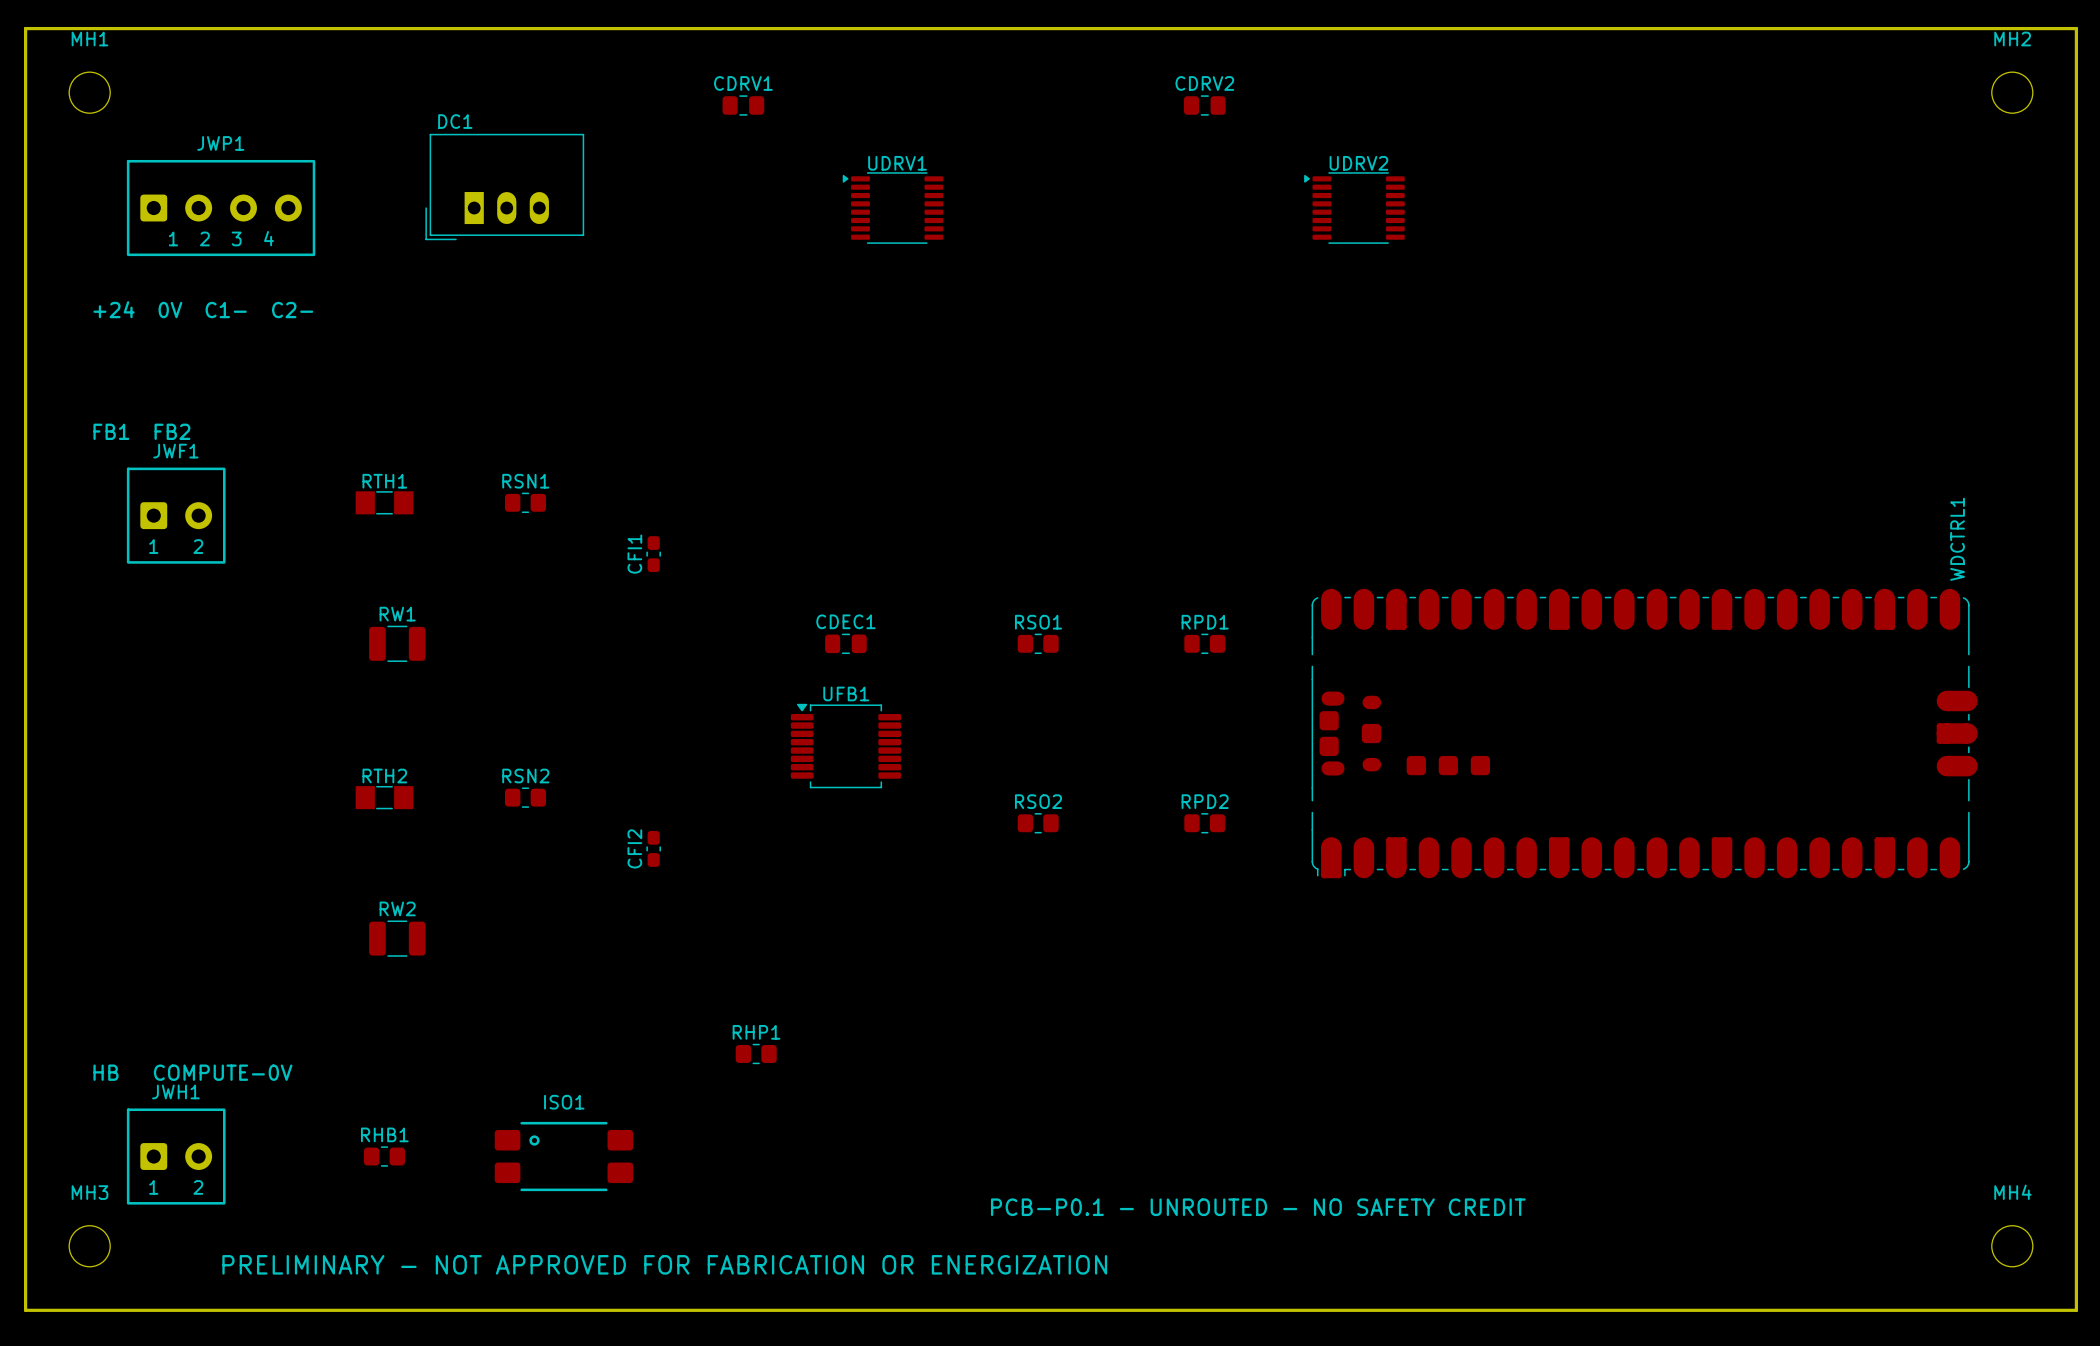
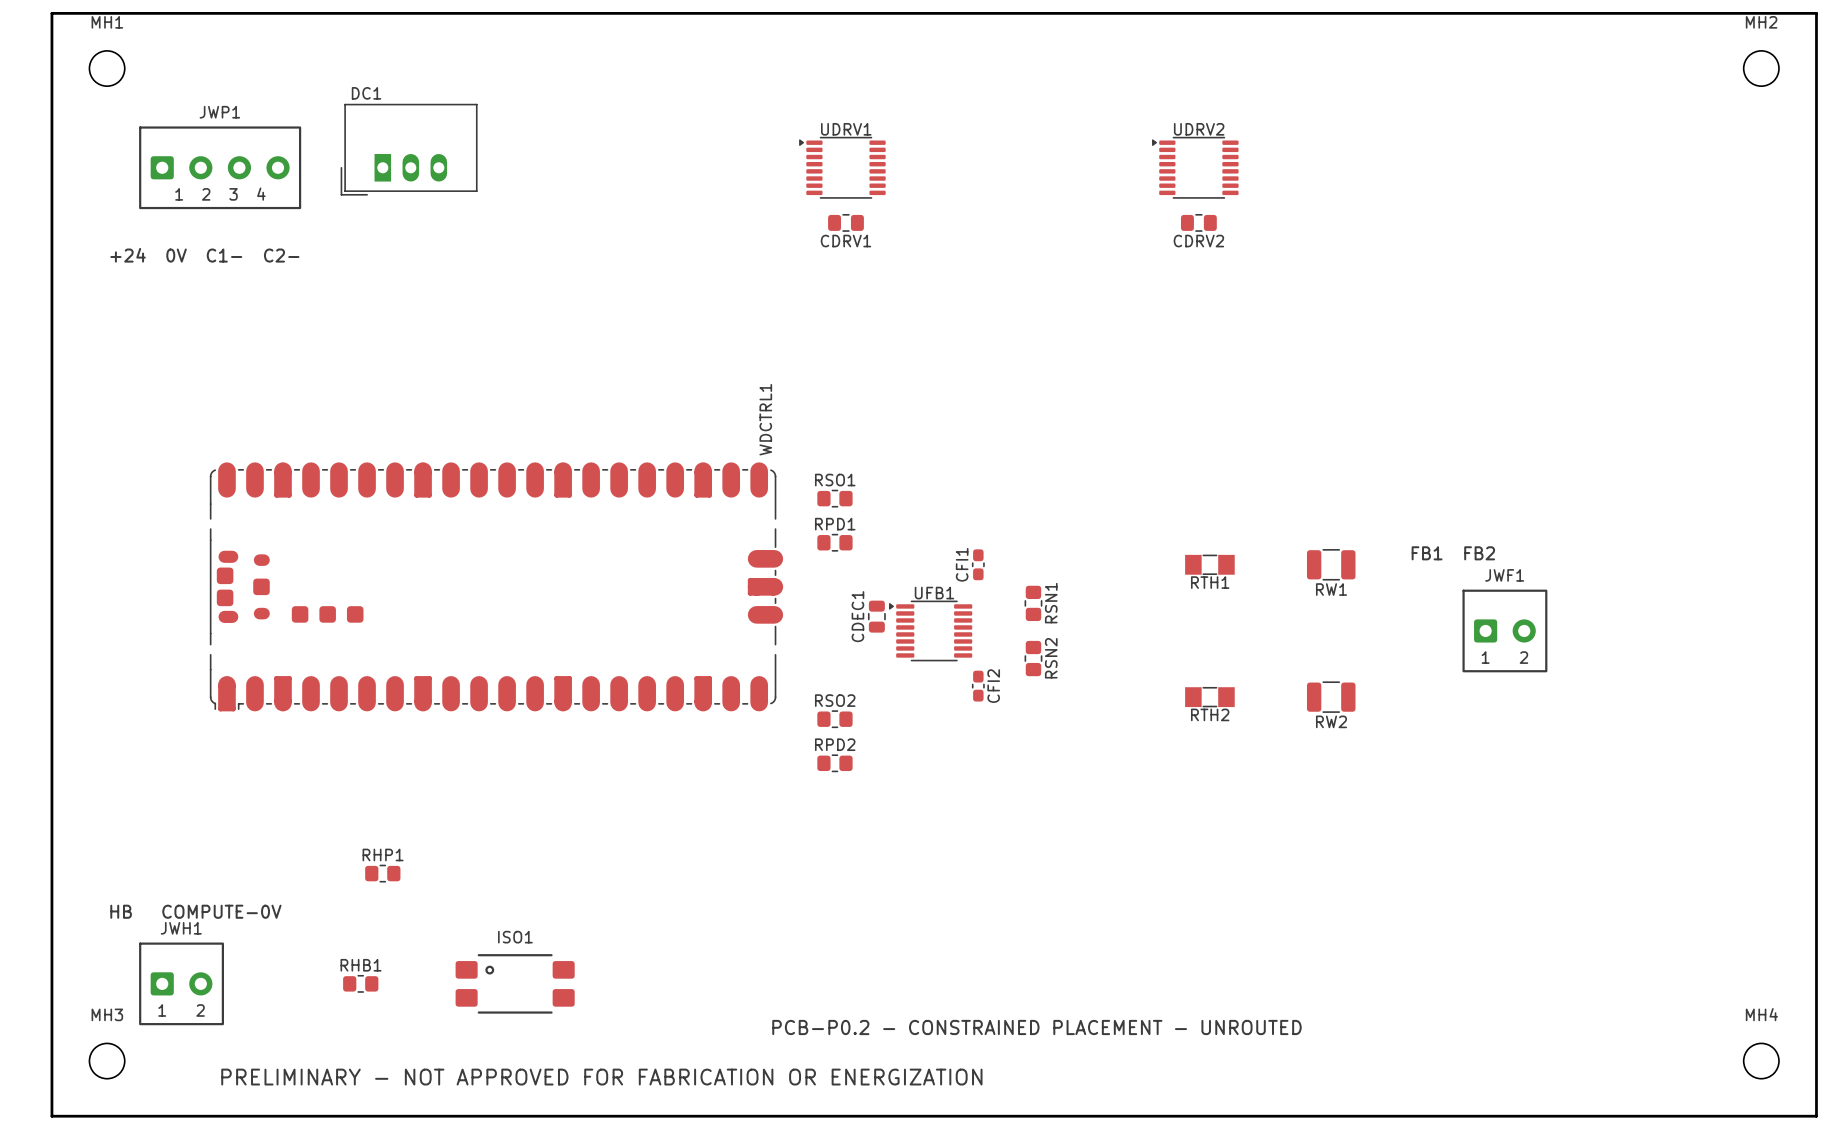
CDRV1 name position: CDRV1 (743, 83) -> CDRV1 (845, 241)
CDRV2 name position: CDRV2 (1204, 83) -> CDRV2 (1198, 241)
CDRV1 position: (743, 105) -> (845, 222)
CDRV2 position: (1204, 105) -> (1198, 222)
DC1 position: (504, 187) -> (409, 149)
UDRV1 position: (893, 208) -> (842, 167)
text: FB1 FB2 (141, 431) -> none
RTH1 name position: RTH1 (384, 481) -> RTH1 (1210, 582)
RTH1 position: (384, 502) -> (1209, 564)
RSN1 rotation: 0° (525, 502) -> 90° clockwise (1033, 603)
RSN1 position: (525, 502) -> (1033, 603)
JWF1 position: (176, 515) -> (1504, 630)
CFI1 position: (653, 554) -> (978, 564)
RW1 name position: RW1 (397, 614) -> RW1 (1331, 589)
CDEC1 name position: CDEC1 (845, 621) -> CDEC1 (857, 616)
CDEC1 footprint: [825, 633, 867, 655] -> [868, 600, 886, 633]
RW1 position: (397, 643) -> (1331, 564)
RSO1 position: (1038, 643) -> (834, 498)
RPD1 position: (1204, 643) -> (834, 542)
text: none -> FB1 FB2 (1453, 553)
UFB1 footprint: [790, 703, 902, 789] -> [889, 600, 973, 662]
WDCTRL1 position: (1644, 733) -> (496, 586)
RTH2 name position: RTH2 (384, 776) -> RTH2 (1210, 714)
RTH2 position: (384, 797) -> (1209, 697)
RSN2 rotation: 0° (525, 797) -> 90° clockwise (1033, 658)
RSN2 position: (525, 797) -> (1033, 658)
RSO2 position: (1038, 823) -> (834, 719)
RPD2 position: (1204, 823) -> (834, 763)
CFI2 name position: CFI2 (634, 848) -> CFI2 (993, 686)
CFI2 position: (653, 848) -> (978, 686)
RW2 name position: RW2 (397, 908) -> RW2 (1331, 721)
RW2 position: (397, 938) -> (1331, 697)
RHP1 position: (756, 1053) -> (382, 873)
text: none -> PCB-P0.2 - CONSTRAINED PLACEMENT - UNROUTED (1036, 1027)
text: PCB-P0.1 - UNROUTED - NO SAFETY CREDIT (1258, 1207) -> none

